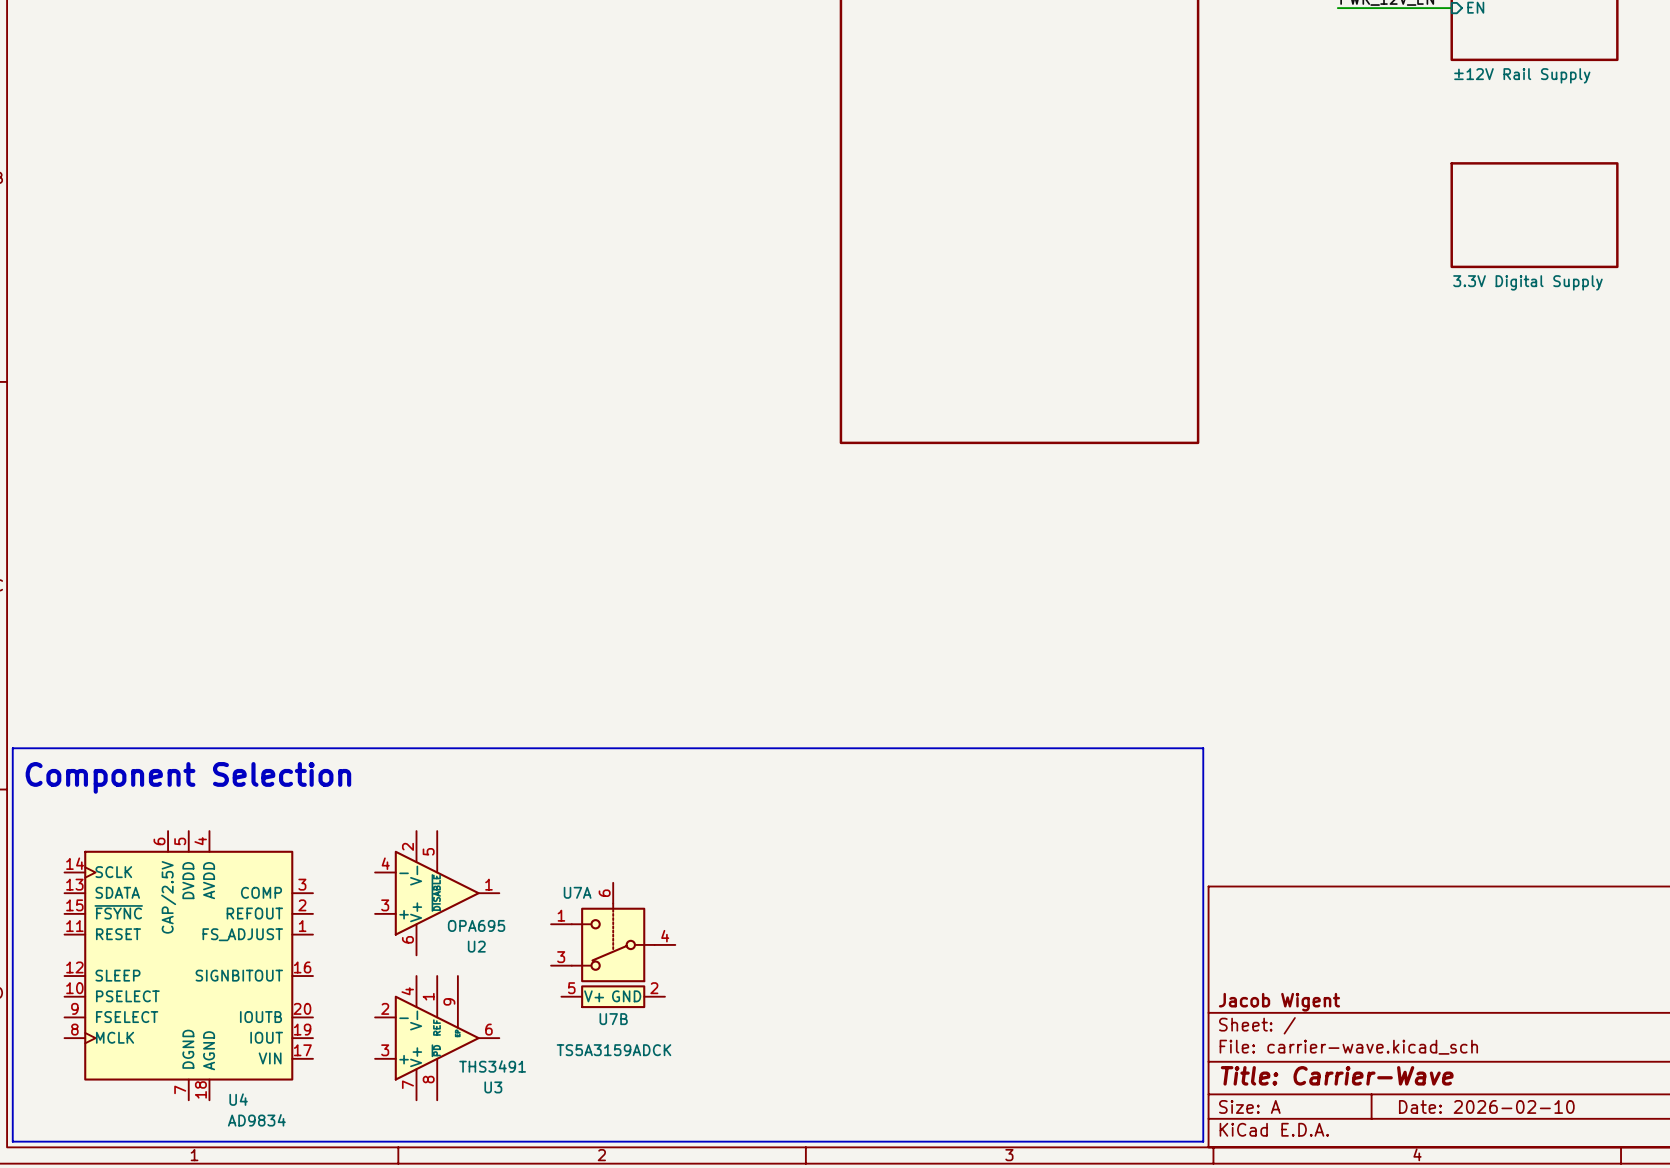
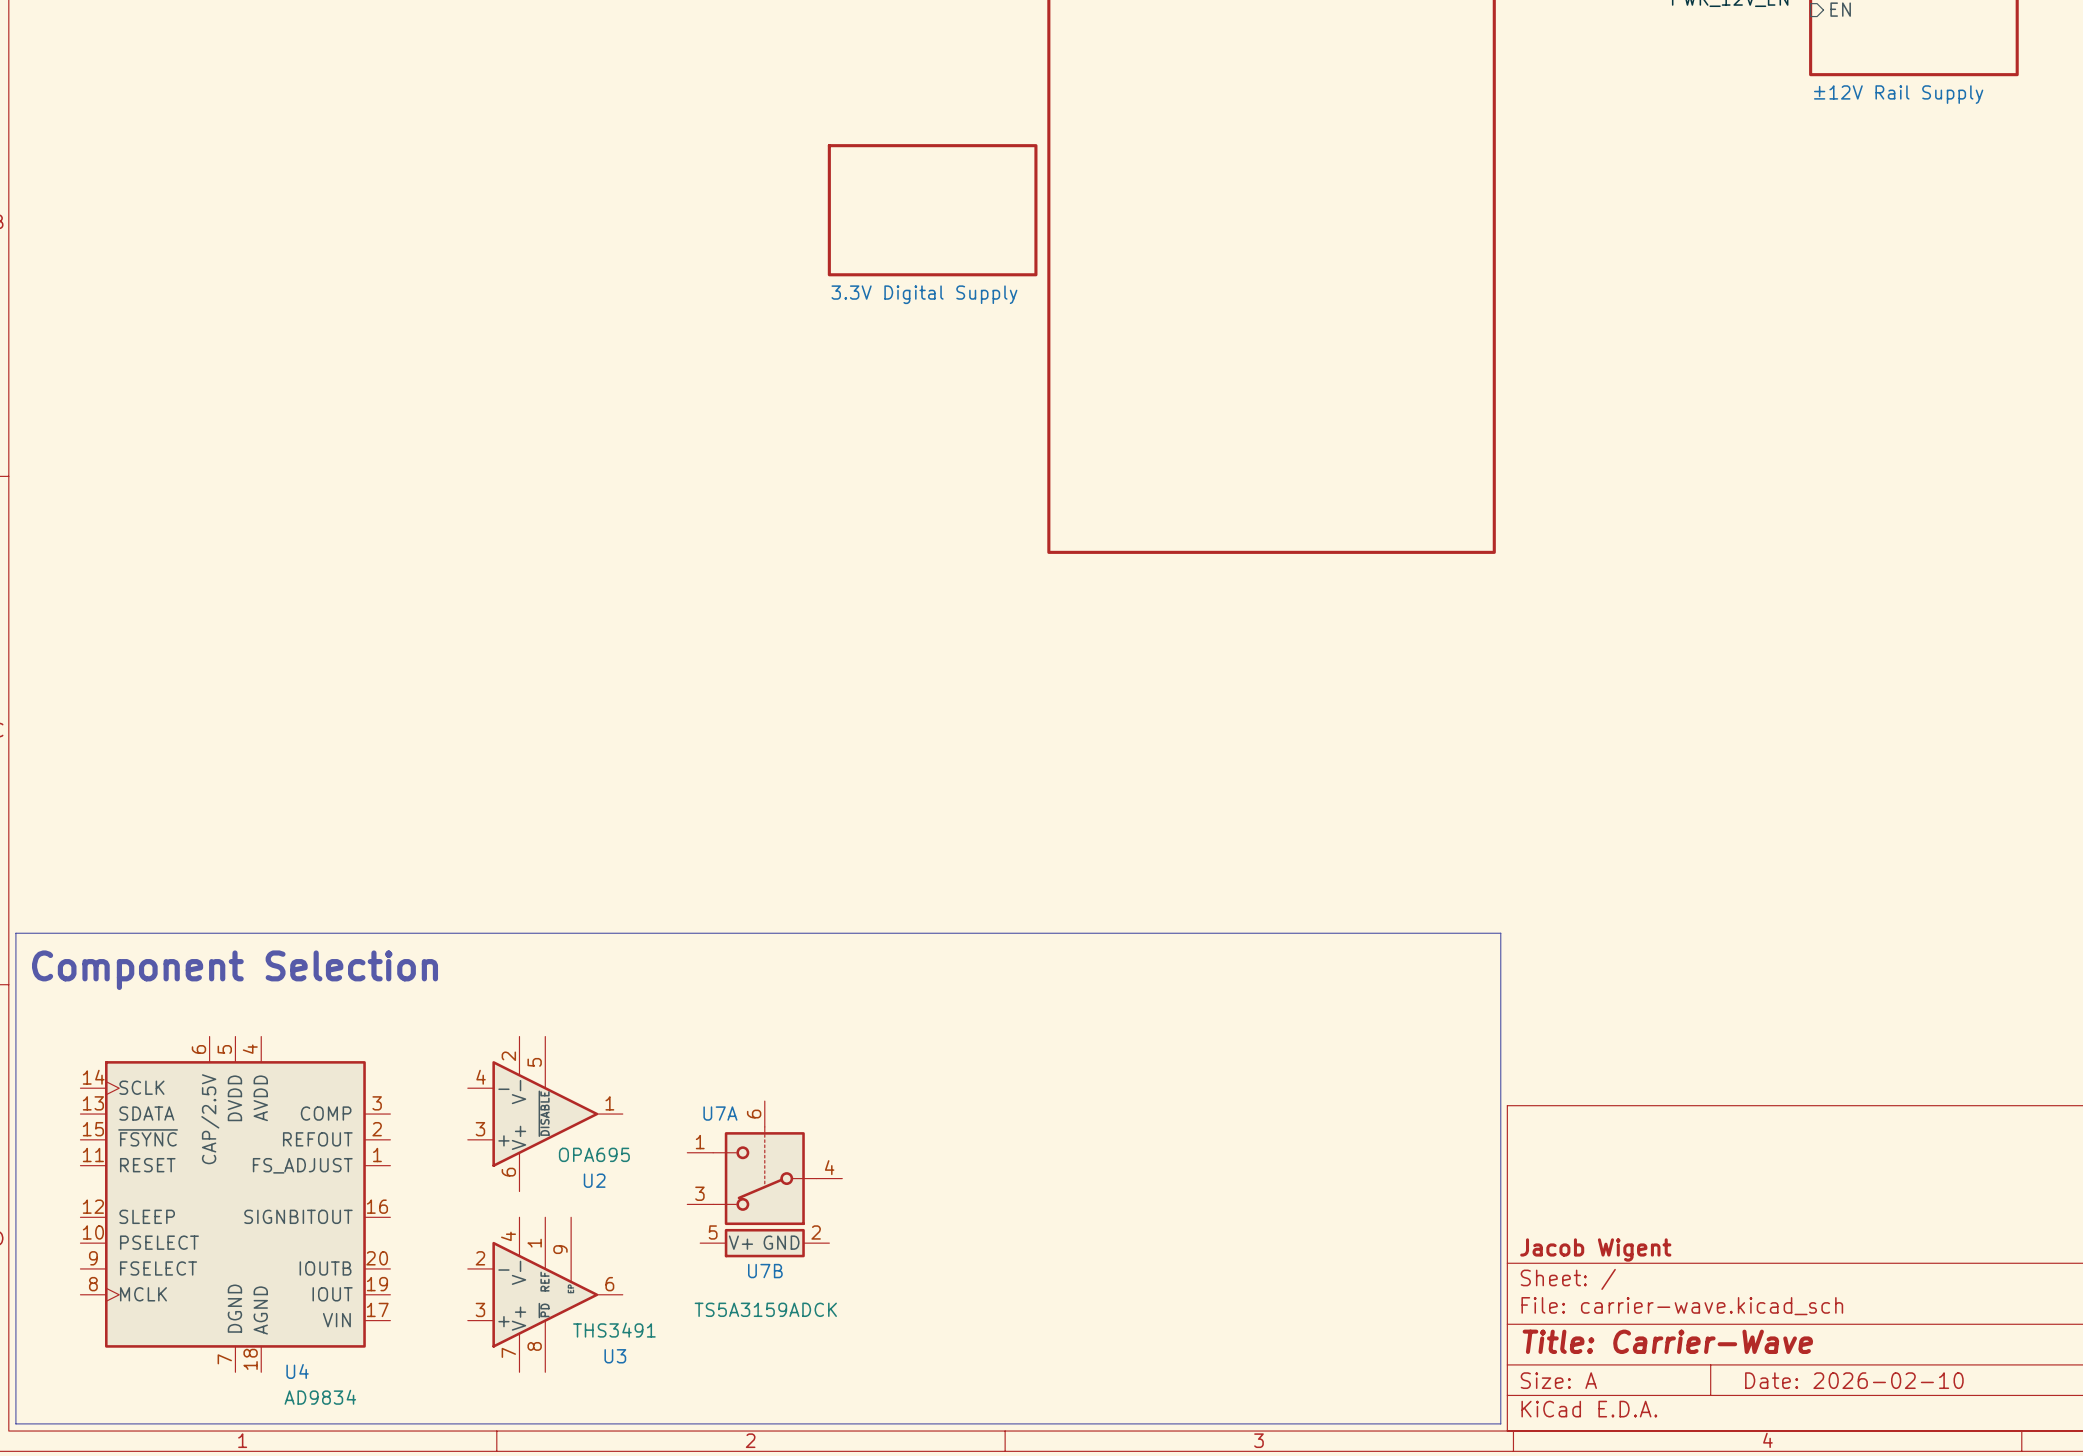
wire: (1337, 8) (1451, 8) -> none
sheet 3.3V Digital Supply position: (1534, 215) -> (932, 210)

